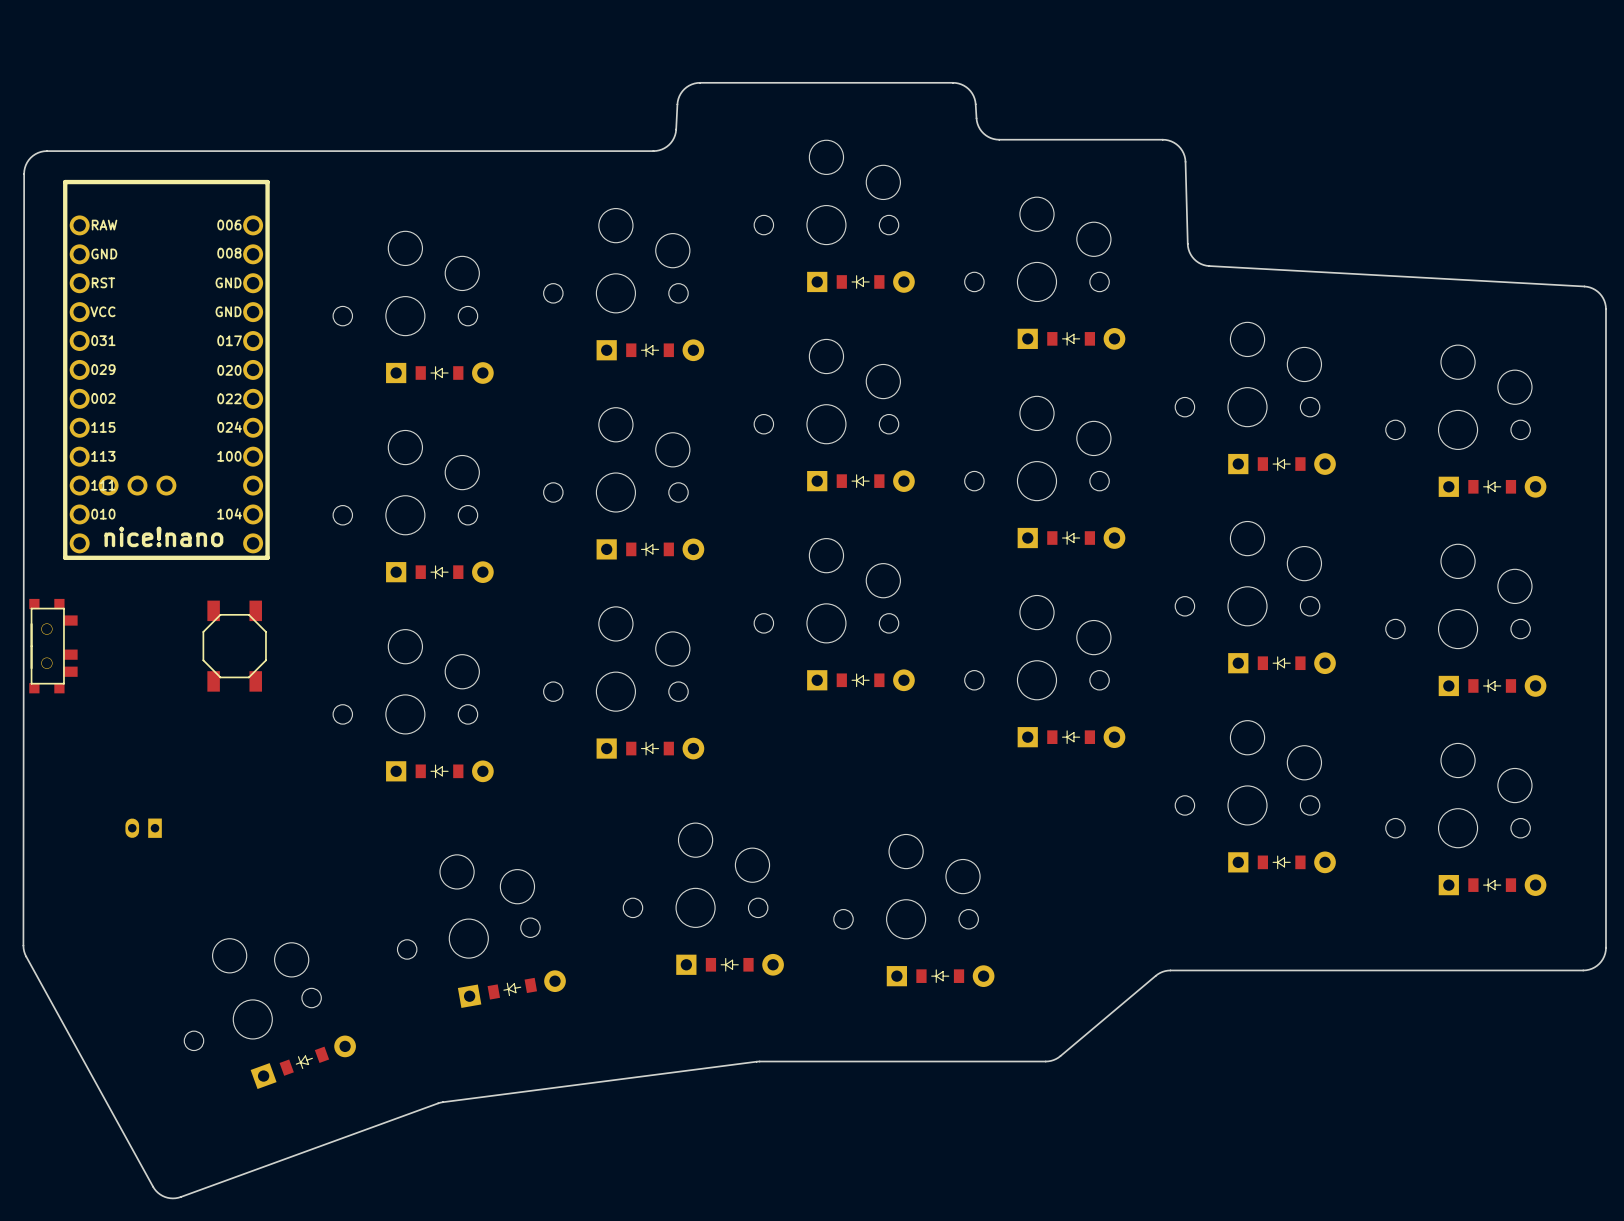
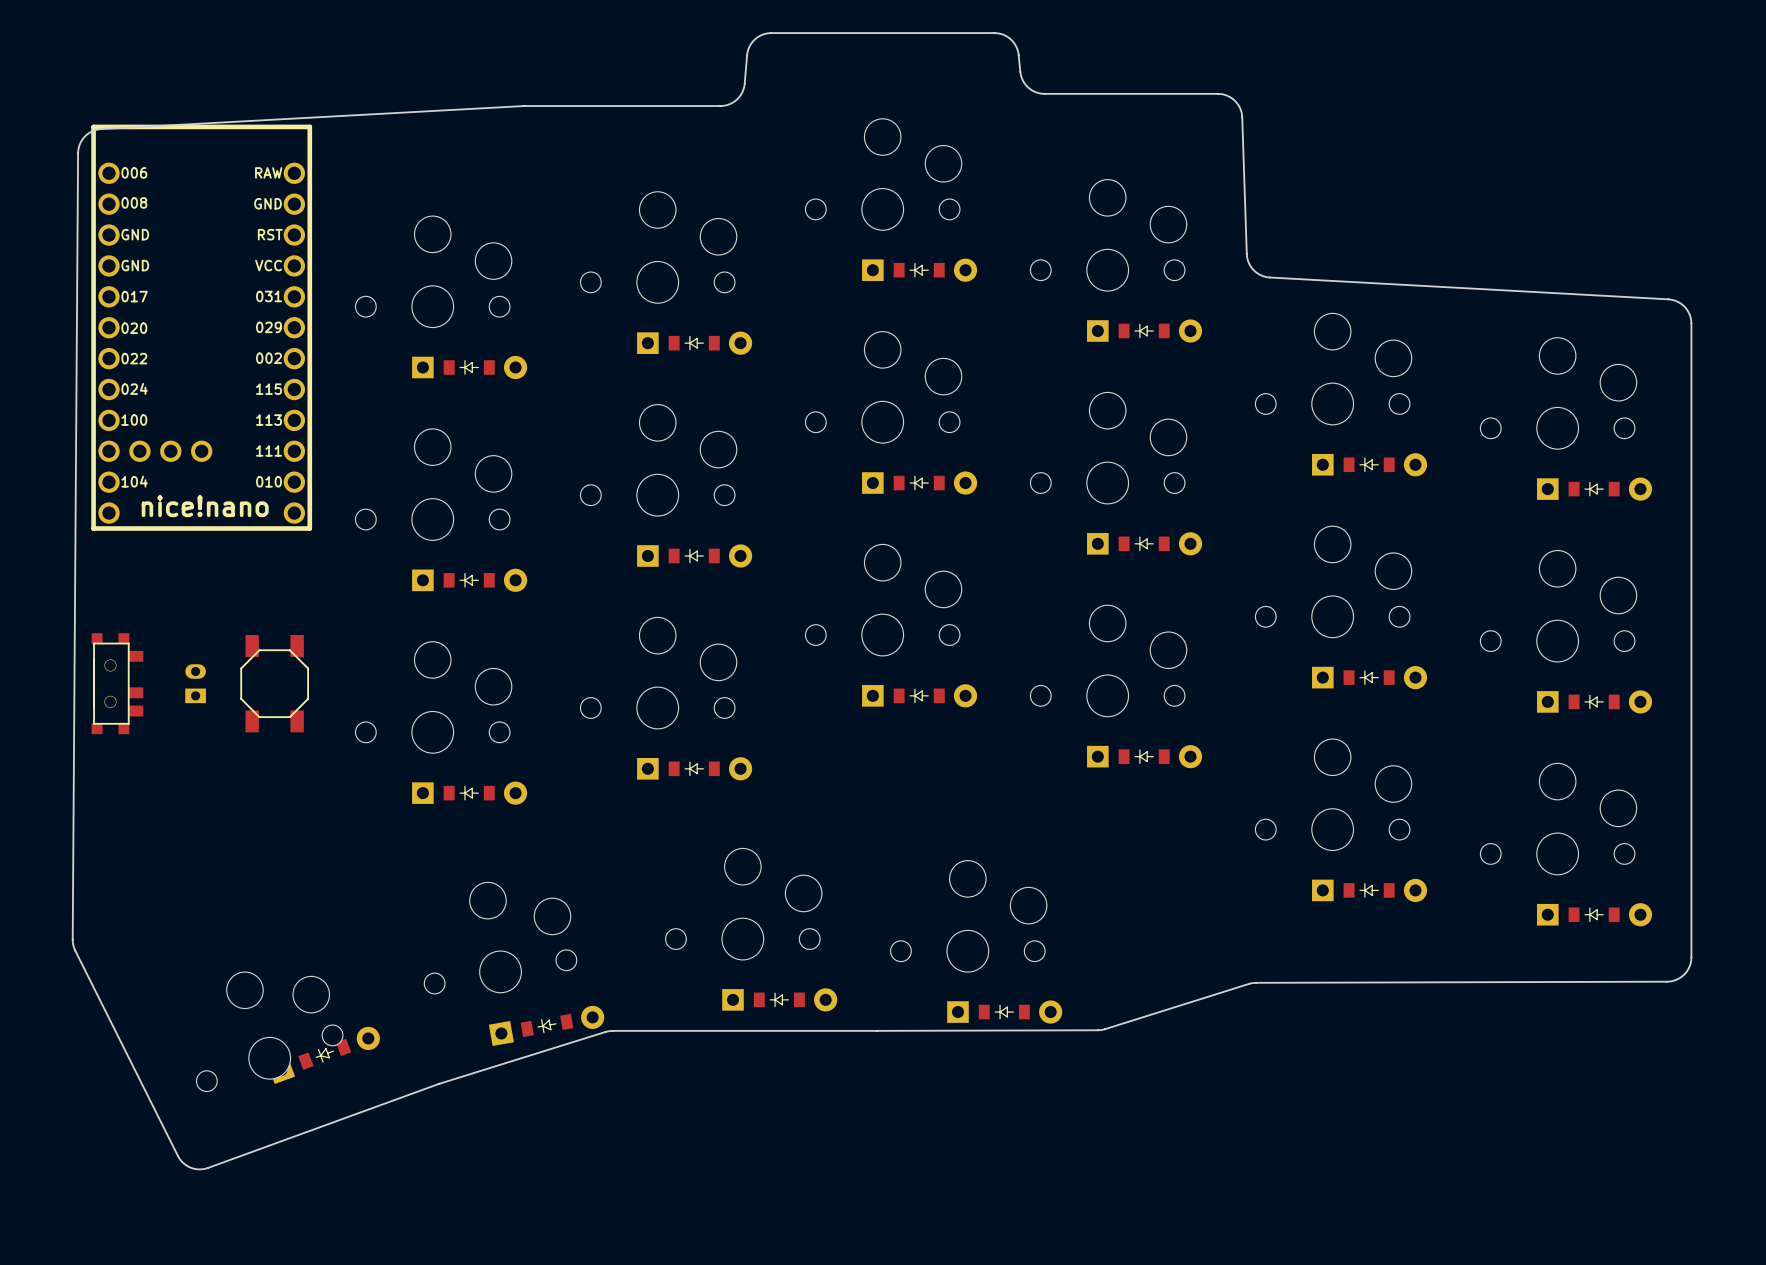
board edge: (700, 82) (955, 82) (963, 85) (972, 93) (975, 101) (978, 126) (985, 135) (993, 138) (1162, 139) (1171, 141) (1180, 148) (1185, 158) (1188, 249) (1196, 261) (1206, 265) (1584, 286) (1592, 288) (1599, 293) (1604, 300) (1605, 309) (1605, 947) (1604, 956) (1599, 963) (1591, 968) (1583, 970) (1167, 970) (1155, 975) (1060, 1056) (1051, 1060) (758, 1061) (442, 1102) (180, 1197) (167, 1197) (156, 1191) (26, 956) (23, 948) (24, 173) (25, 165) (33, 155) (46, 151) (656, 150) (666, 146) (674, 137) (677, 101) (680, 93) (689, 85) (700, 82) -> (876, 1030) (609, 1031) (439, 1083) (208, 1167) (193, 1168) (181, 1160) (72, 942) (78, 153) (81, 141) (87, 134) (101, 129) (523, 106) (723, 105) (732, 103) (740, 95) (744, 86) (748, 49) (754, 39) (765, 33) (997, 33) (1008, 37) (1014, 43) (1018, 52) (1022, 80) (1028, 87) (1038, 93) (1217, 93) (1227, 95) (1234, 100) (1240, 108) (1242, 117) (1247, 257) (1251, 267) (1261, 275) (1269, 277) (1668, 299) (1677, 301) (1684, 306) (1689, 314) (1691, 323) (1691, 957) (1689, 966) (1684, 974) (1676, 979) (1667, 981) (1254, 982) (1101, 1029) (876, 1030)
part: none -> (201, 327)
part: (166, 369) -> none
part position: (53, 646) -> (117, 683)
part position: (234, 646) -> (274, 683)
part rotation: 0° (143, 828) -> 90° clockwise (195, 683)
part position: (143, 828) -> (195, 683)
part position: (303, 1062) -> (323, 1055)

